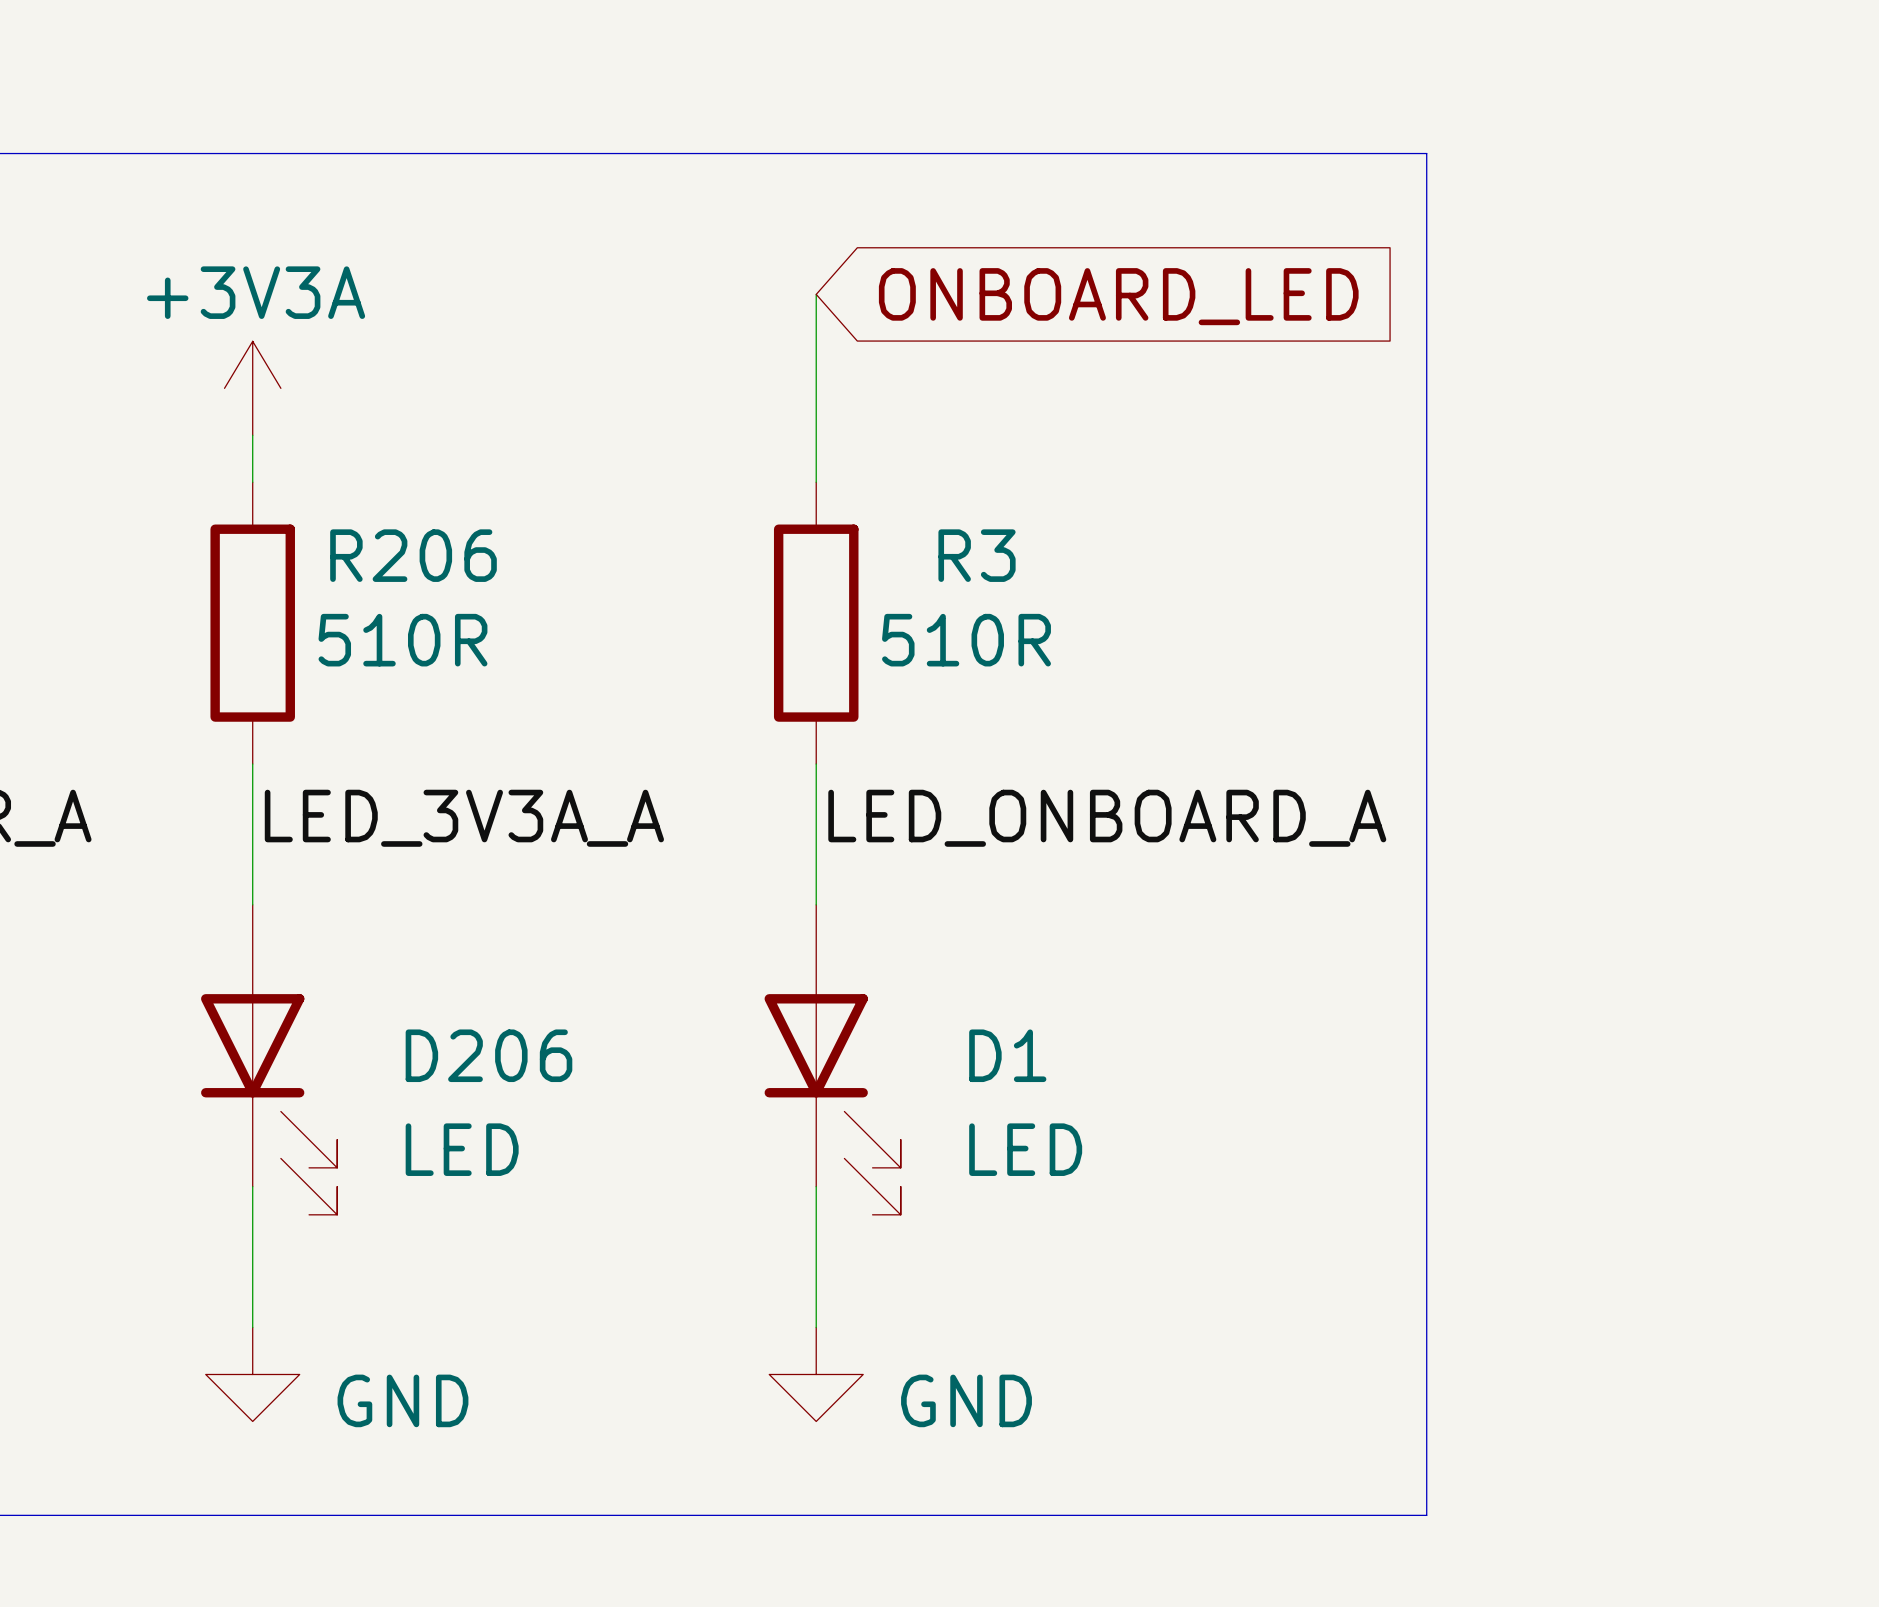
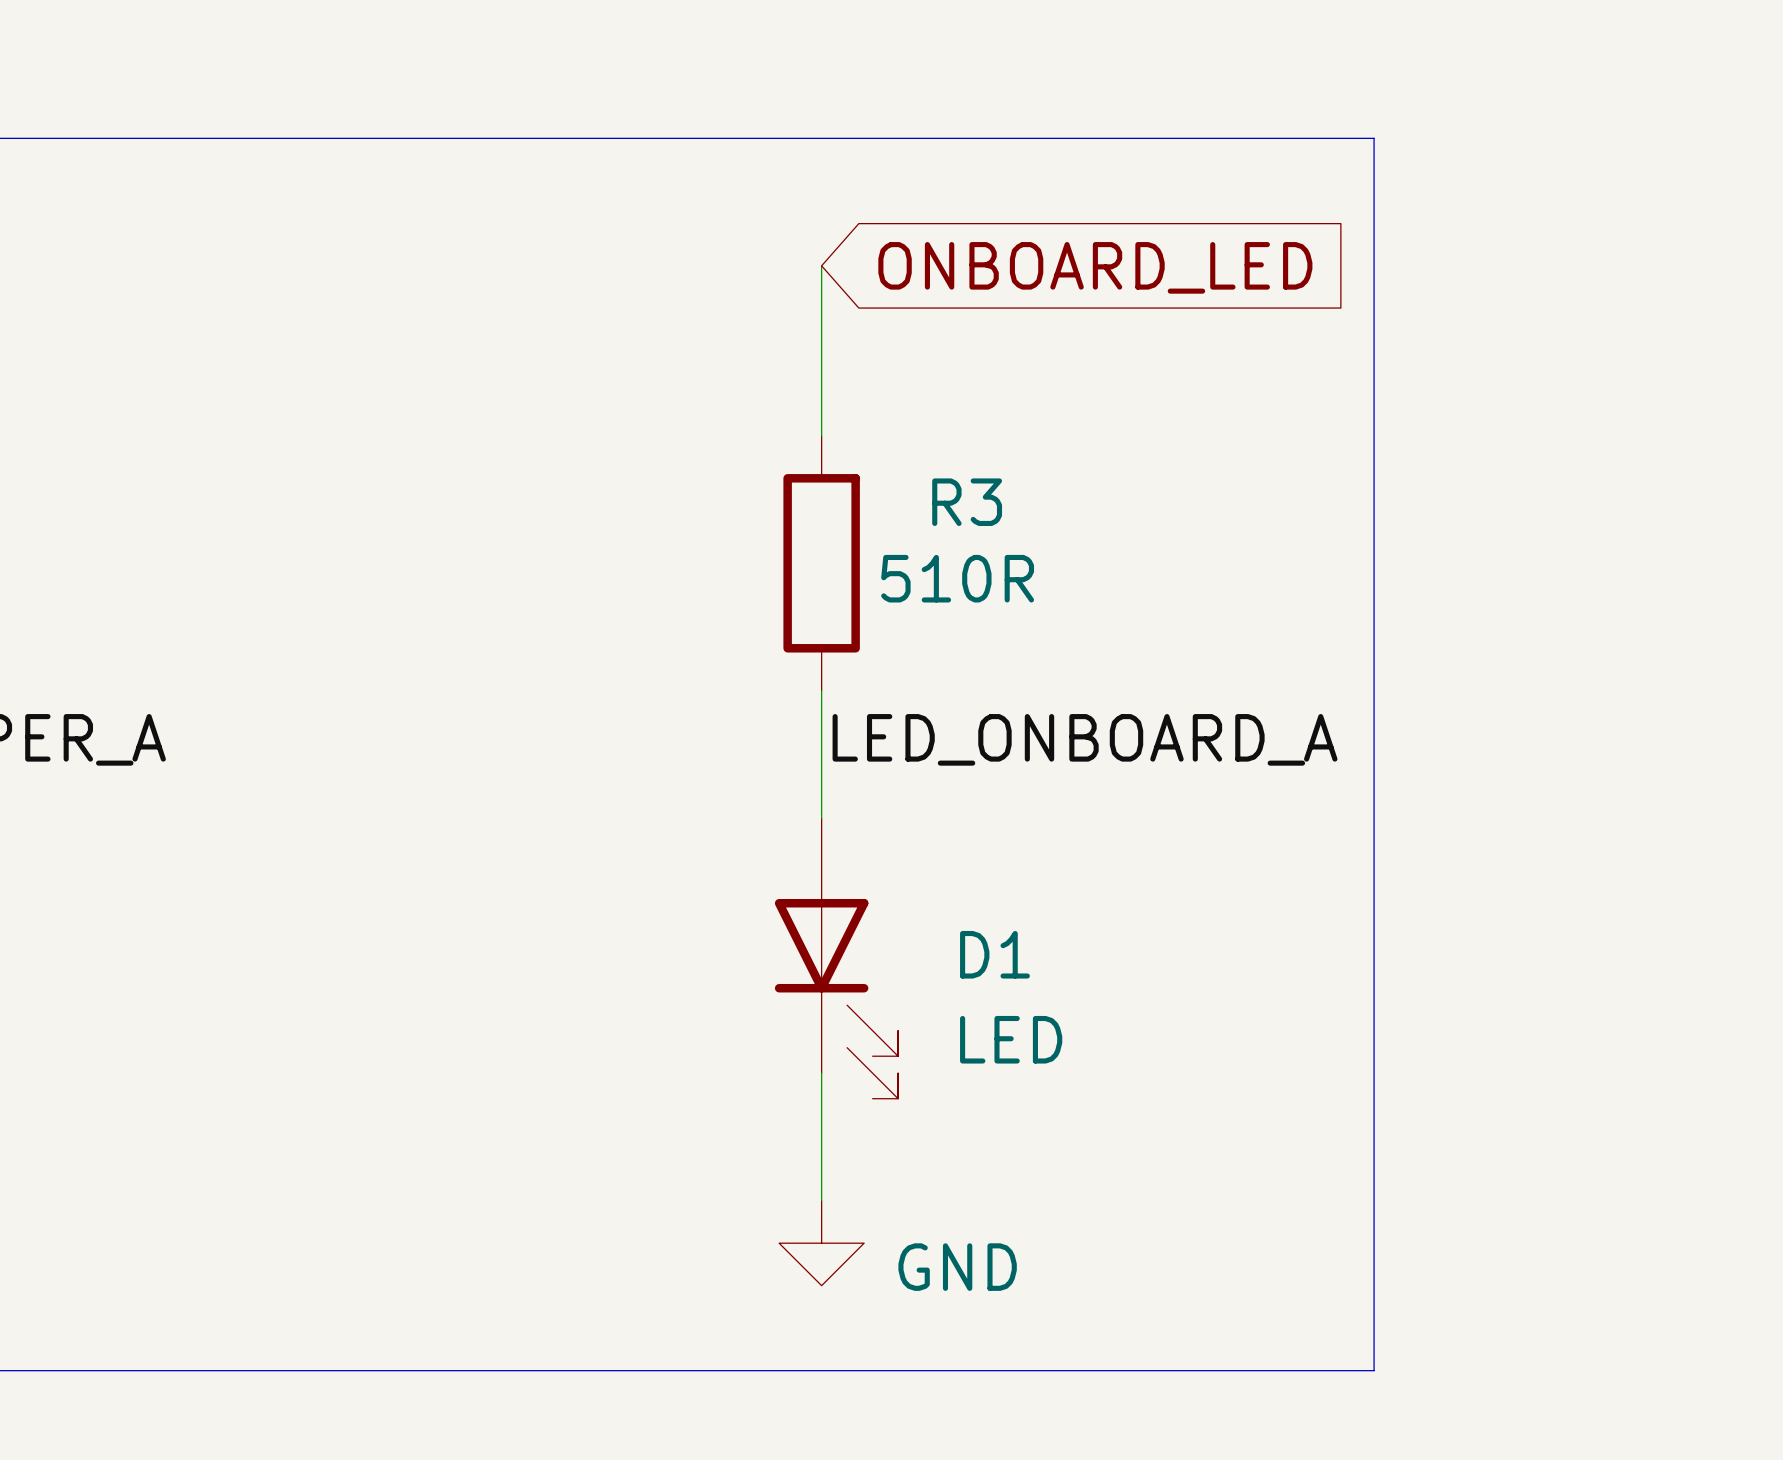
power symbol: +3V3A (252, 388) -> none
wire: (252, 435) (252, 482) -> none
R206: 510R (252, 623) -> none
wire: (252, 764) (252, 904) -> none
label: LED_3V3A_A (464, 818) -> none
D206: LED (269, 1059) -> none
wire: (252, 1186) (252, 1327) -> none
power symbol: GND (252, 1374) -> none

